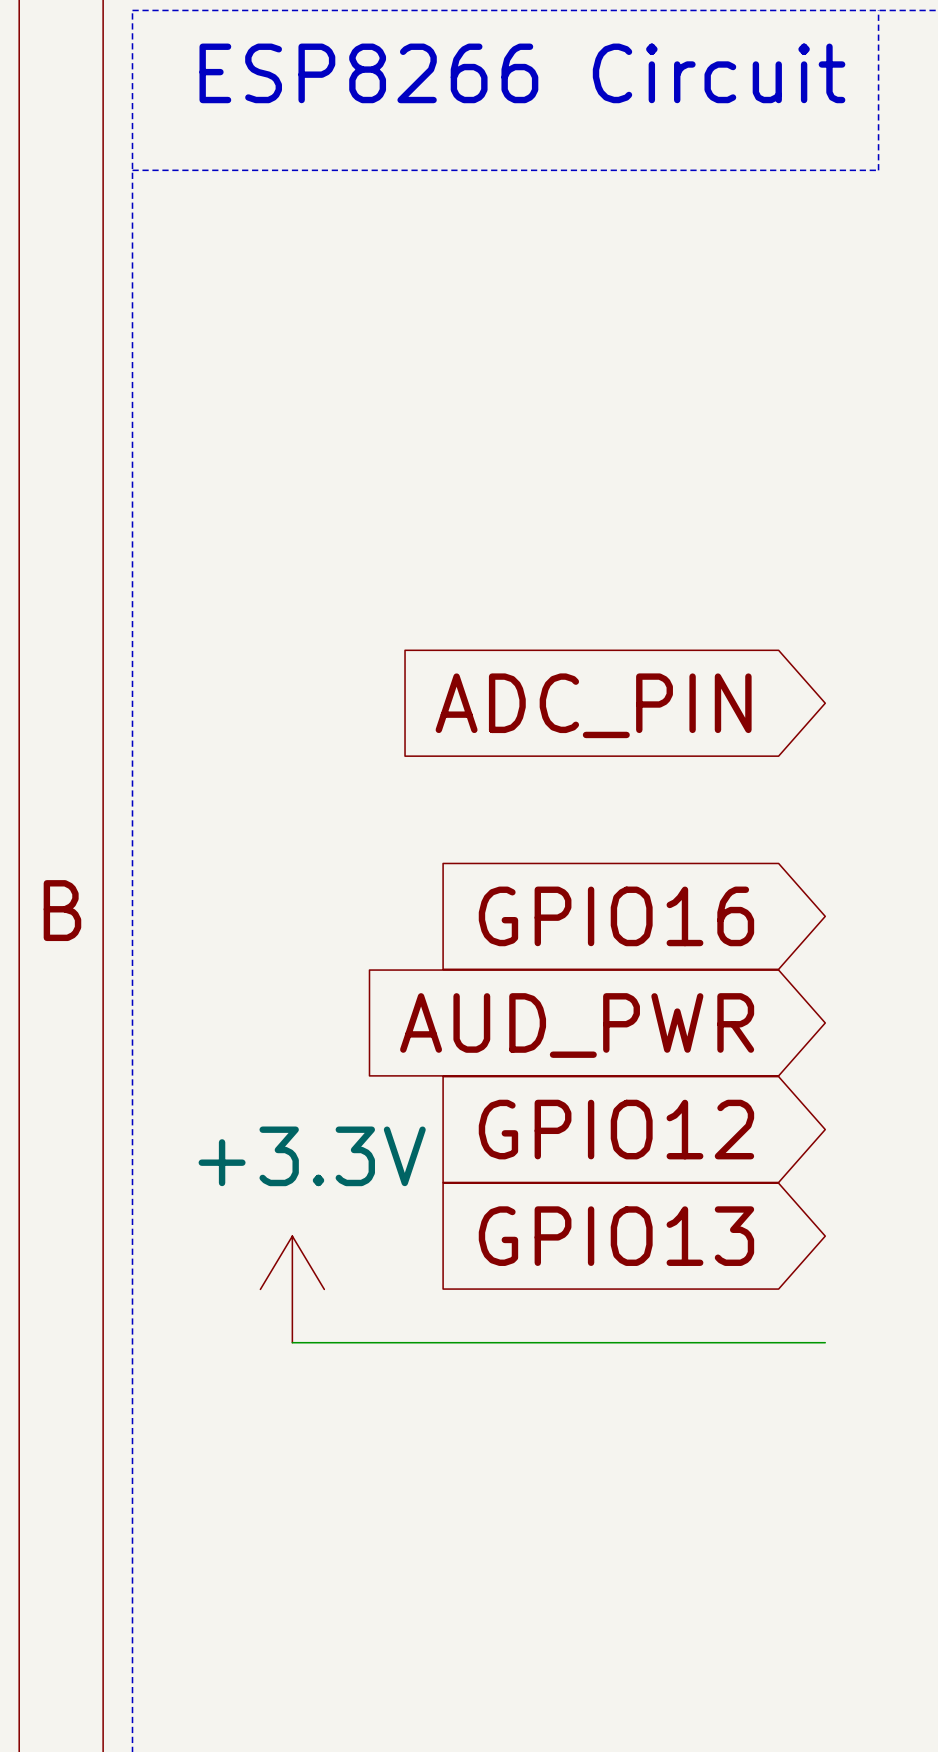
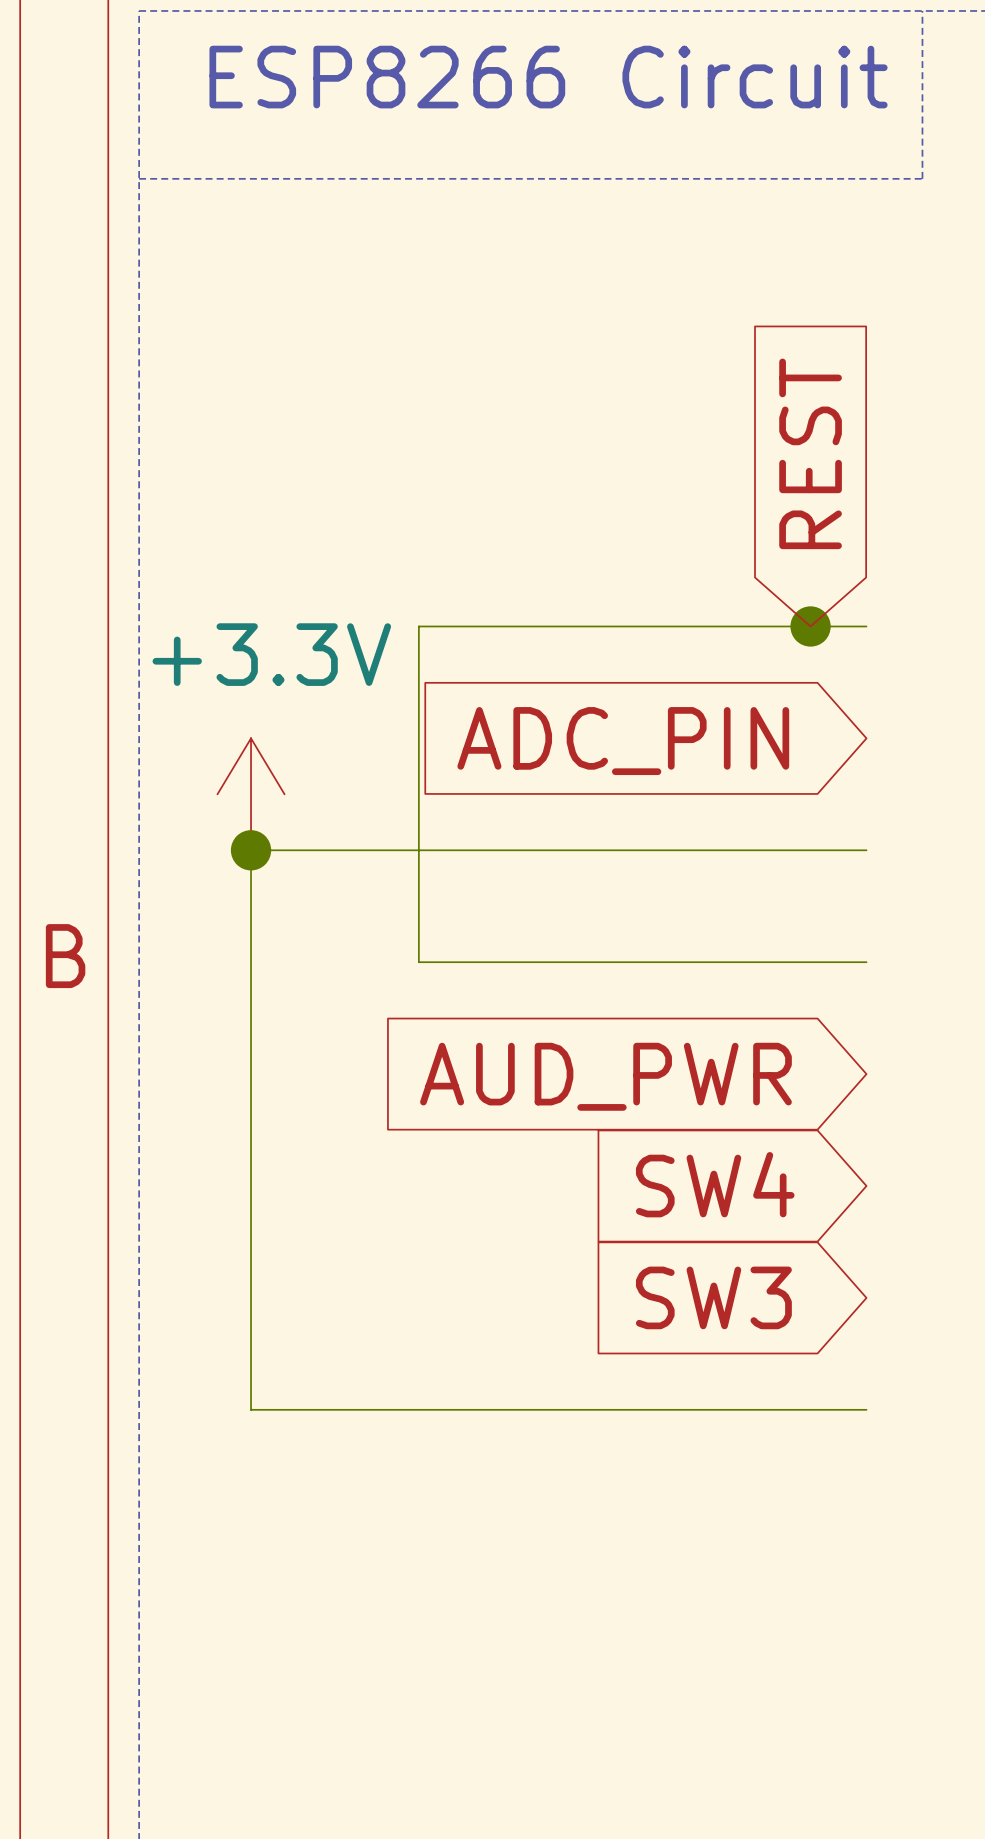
global label: none -> REST (810, 453)
junction: none -> (810, 626)
wire: none -> (866, 626) (418, 626) (418, 962) (866, 962)
junction: none -> (251, 850)
wire: none -> (866, 850) (251, 850) (251, 1409) (306, 1409)
global label: GPIO16 (616, 916) -> none
global label: GPIO12 (616, 1129) -> SW4 (715, 1184)
global label: GPIO13 (616, 1236) -> SW3 (713, 1297)
power symbol position: +3.3V (292, 1289) -> +3.3V (251, 794)

